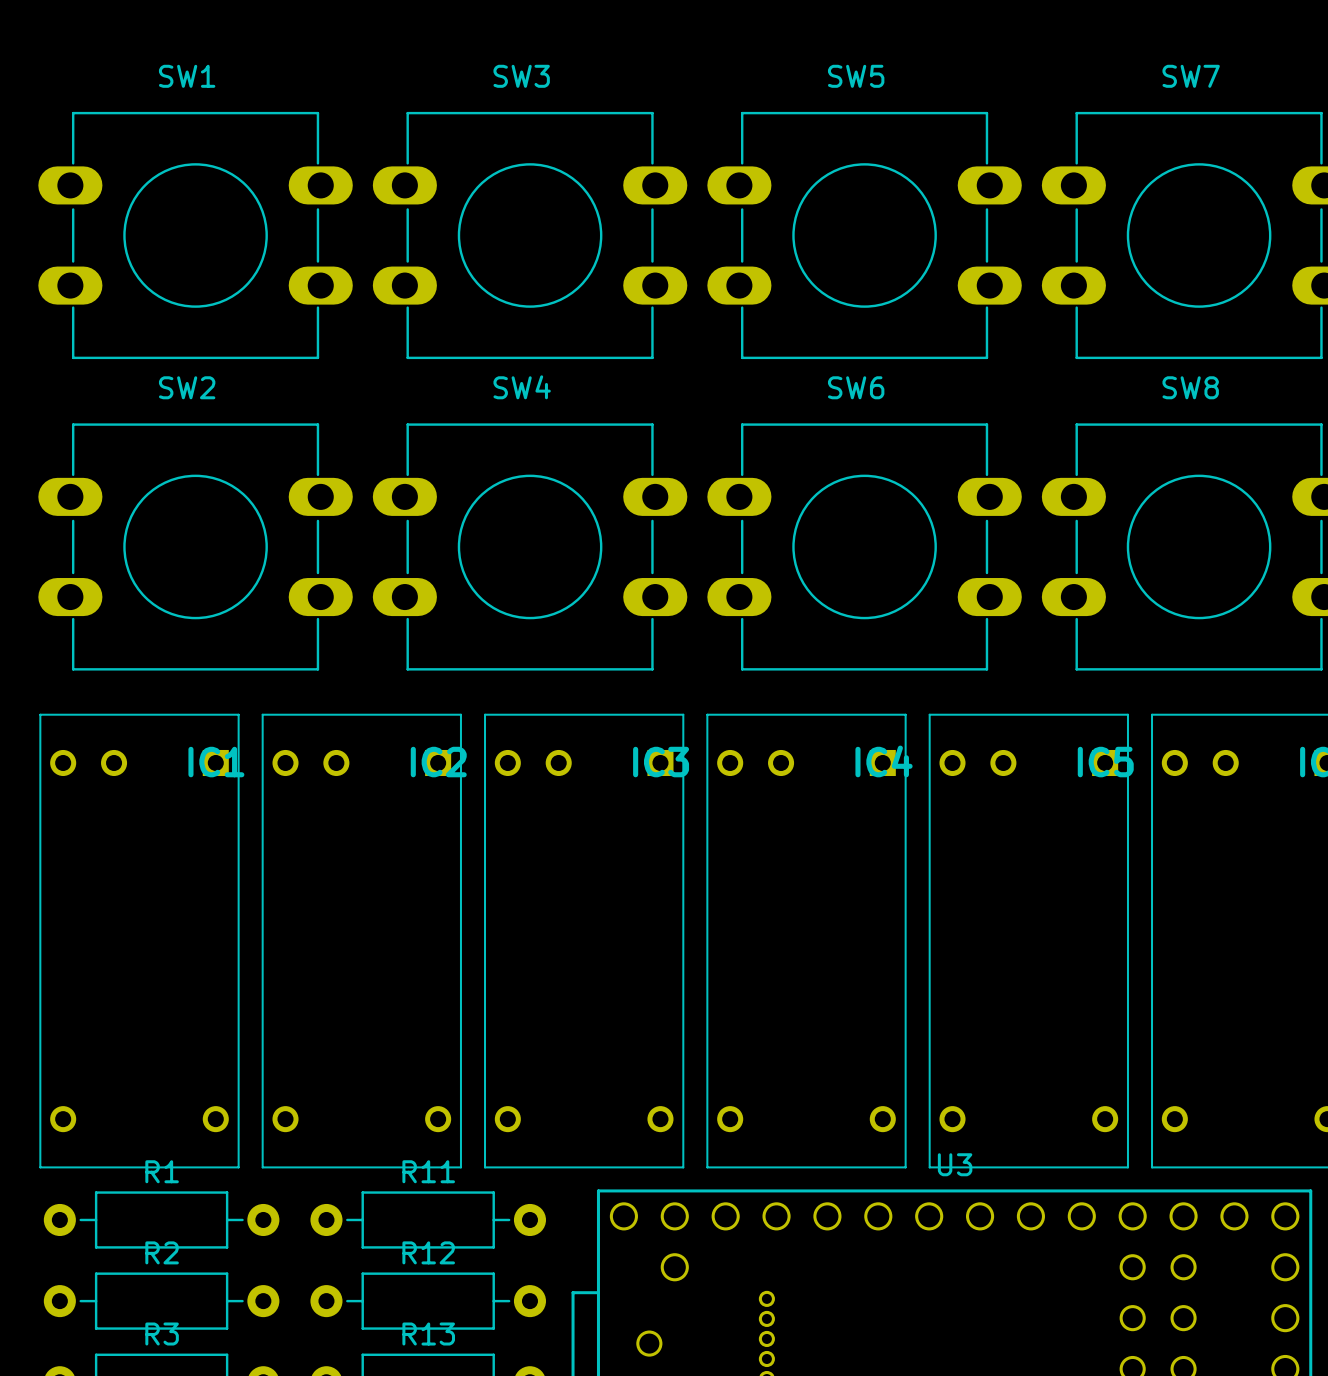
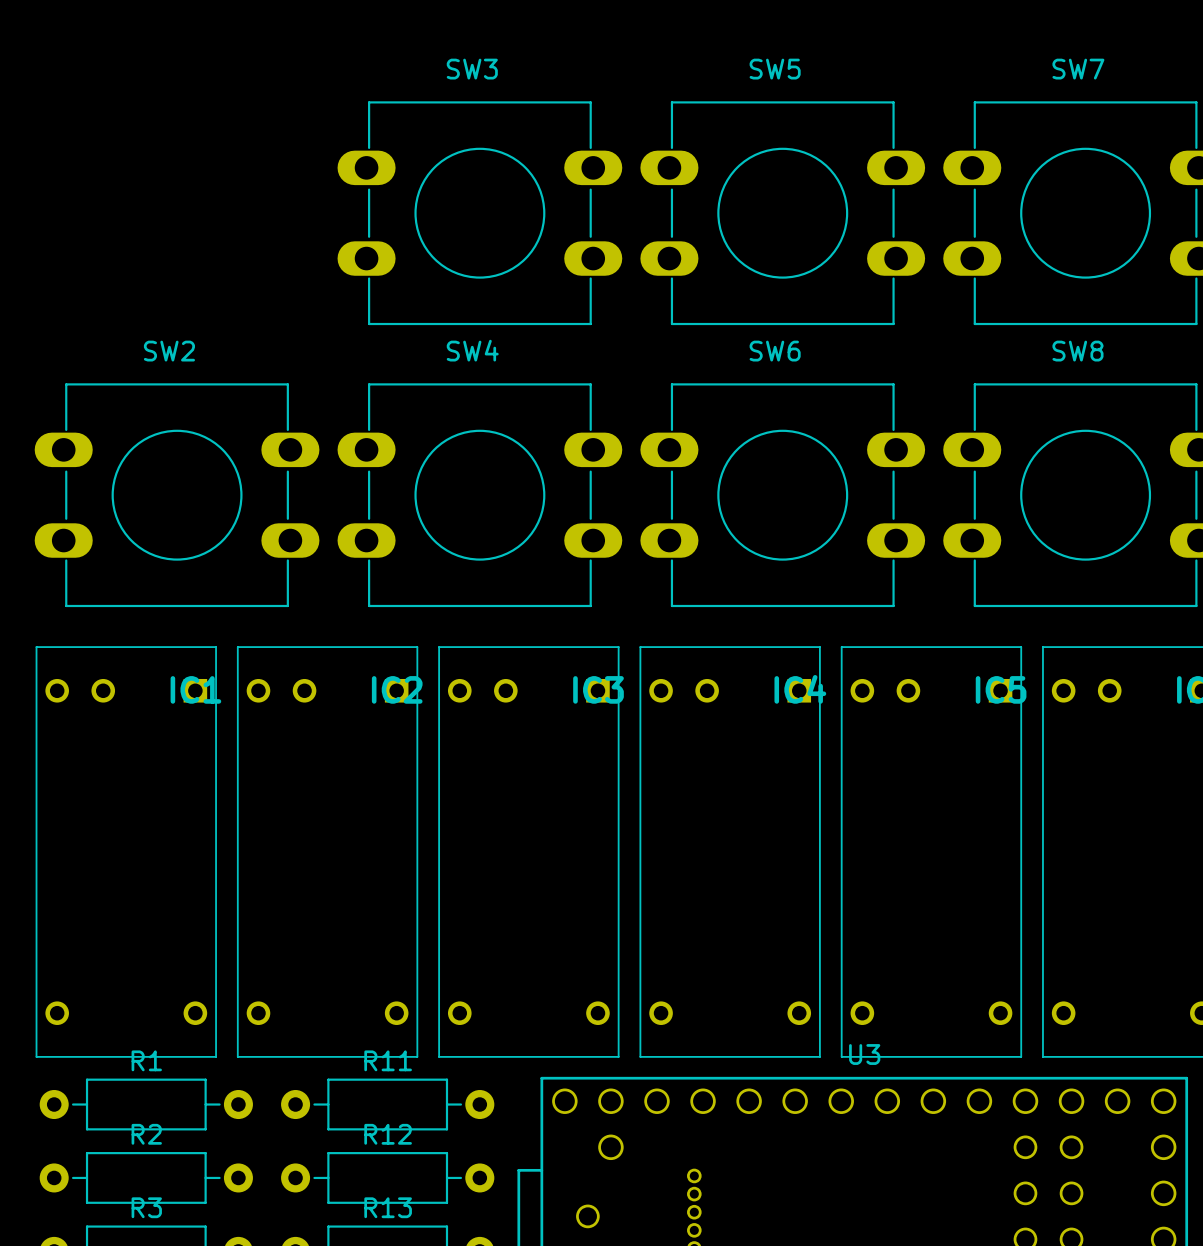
SW1: (195, 235) -> none

